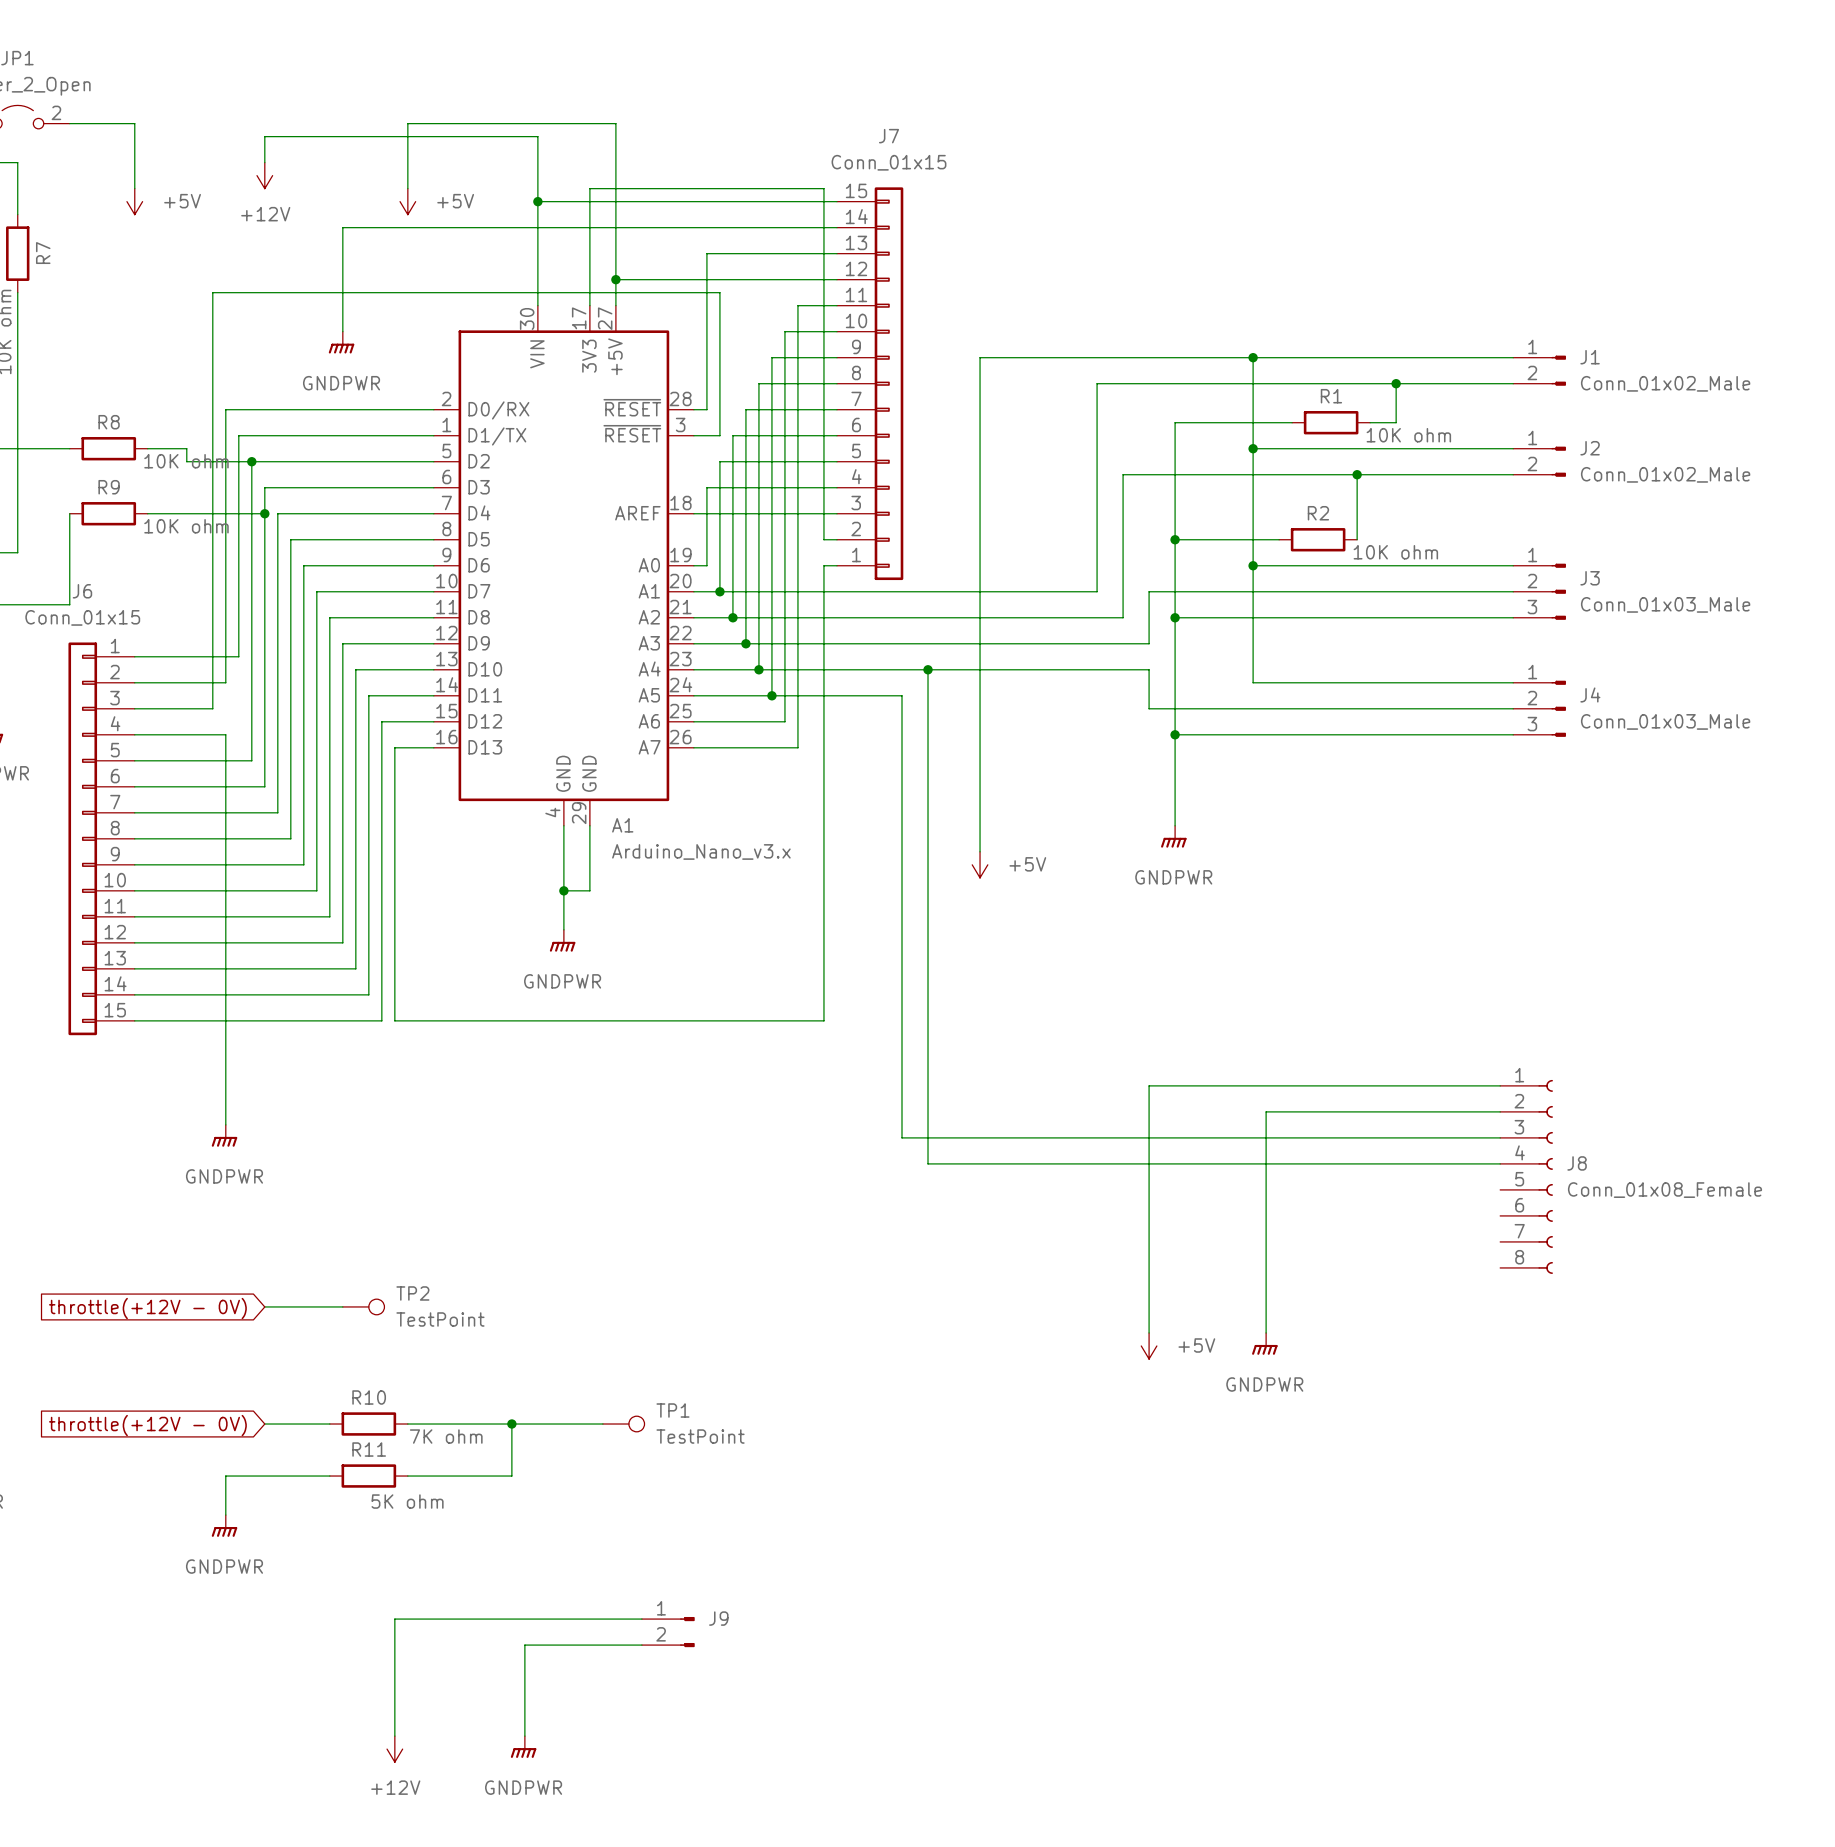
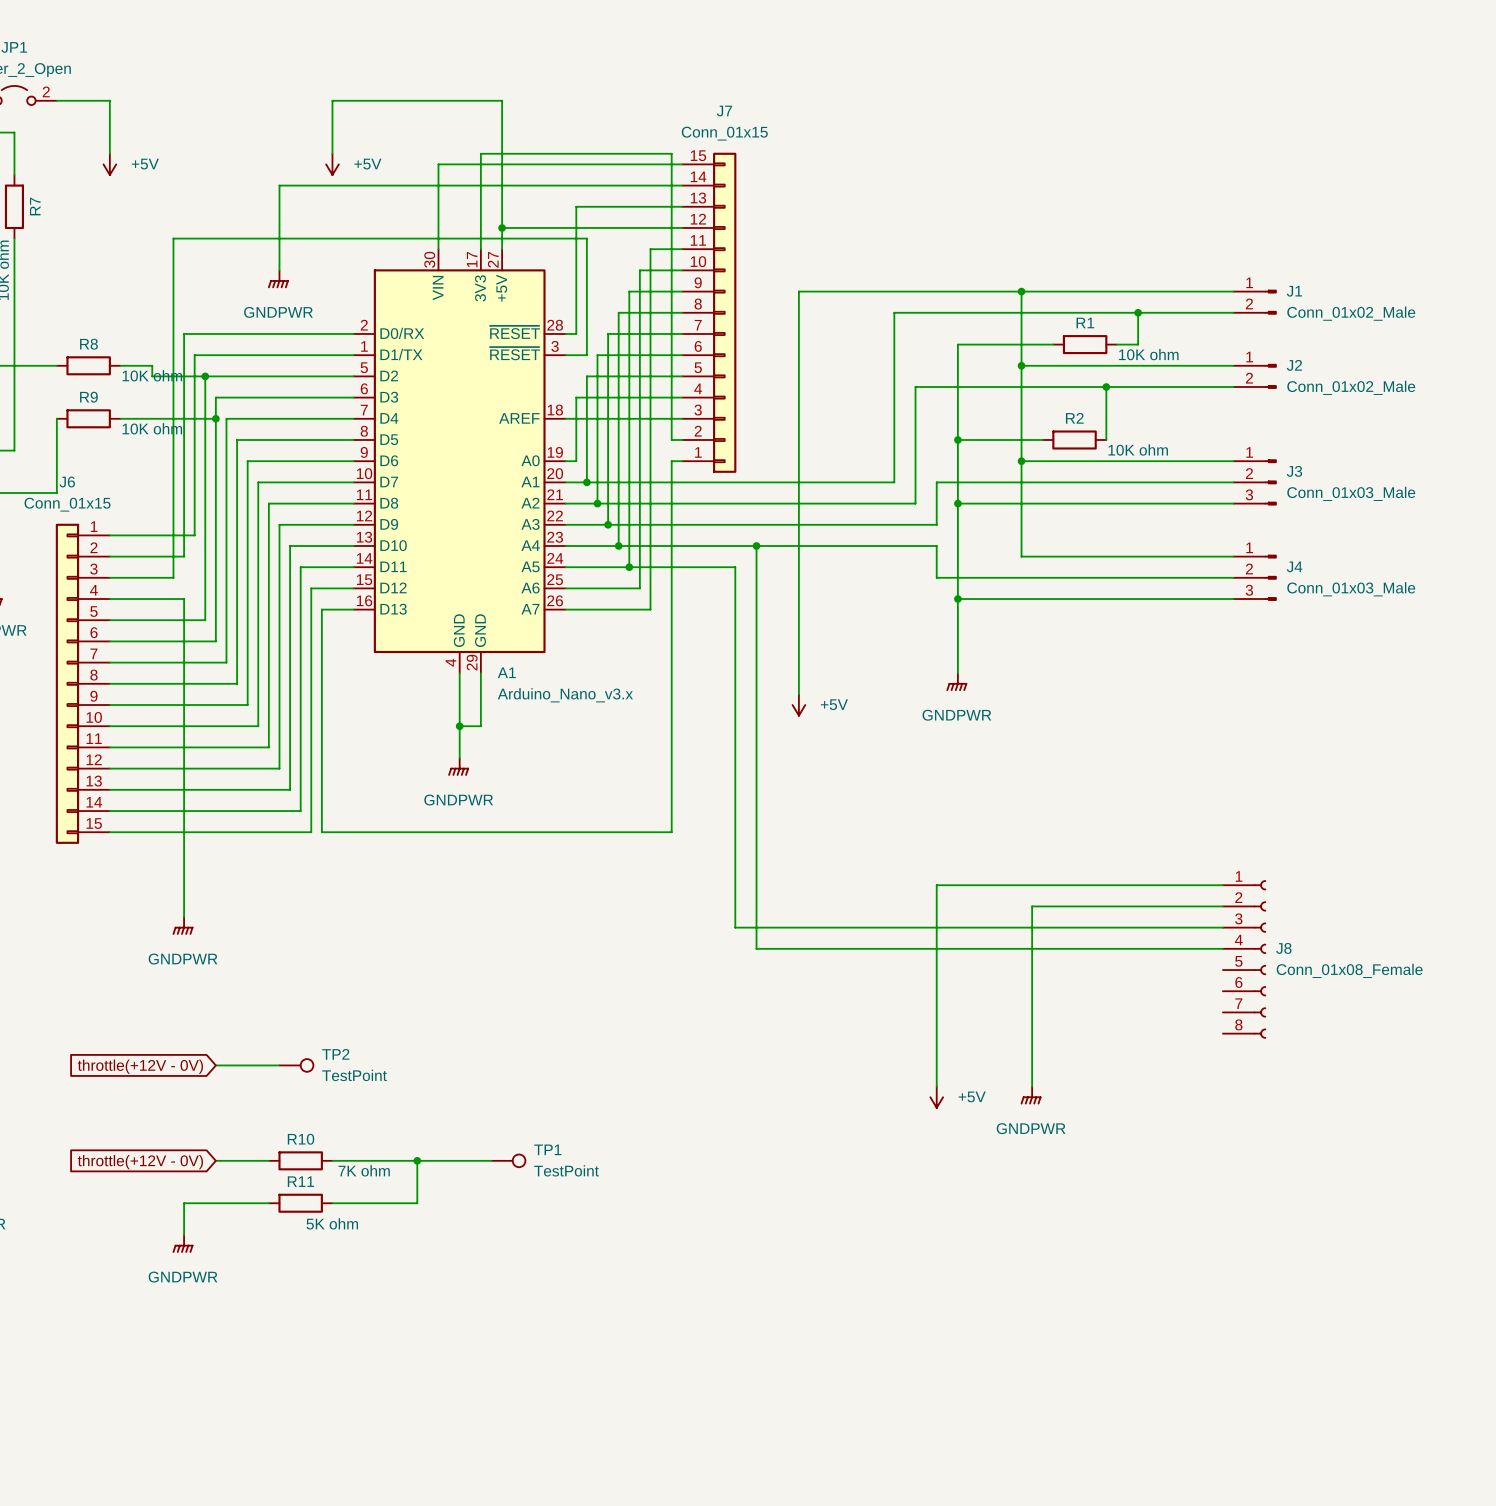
wire: (264, 162) (264, 136) (537, 136) (537, 201) -> none
power symbol: +12V (264, 175) -> none
junction: (537, 201) -> none
wire: (641, 1619) (394, 1619) (394, 1736) -> none
J9: (668, 1632) -> none
wire: (641, 1645) (524, 1645) (524, 1736) -> none
power symbol: GNDPWR (523, 1747) -> none
power symbol: +12V (394, 1749) -> none

